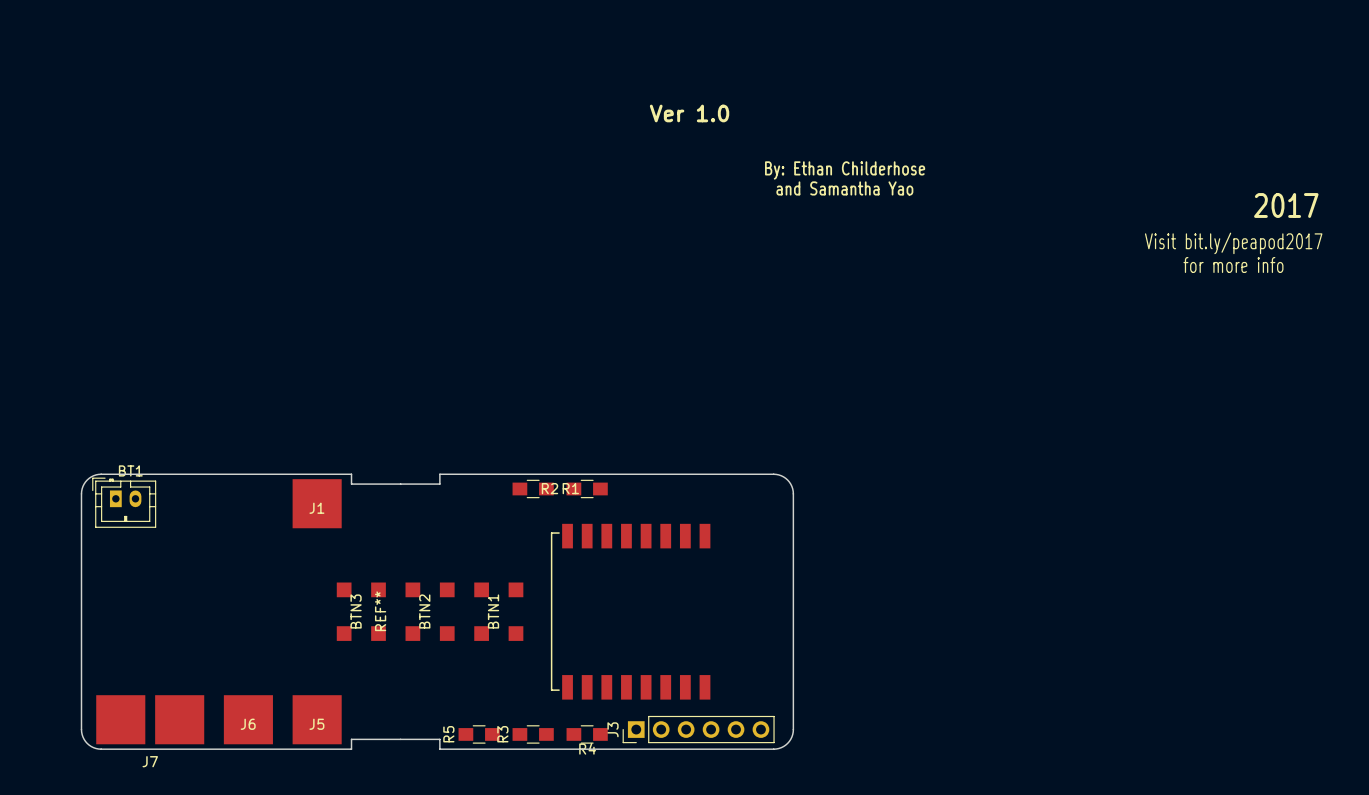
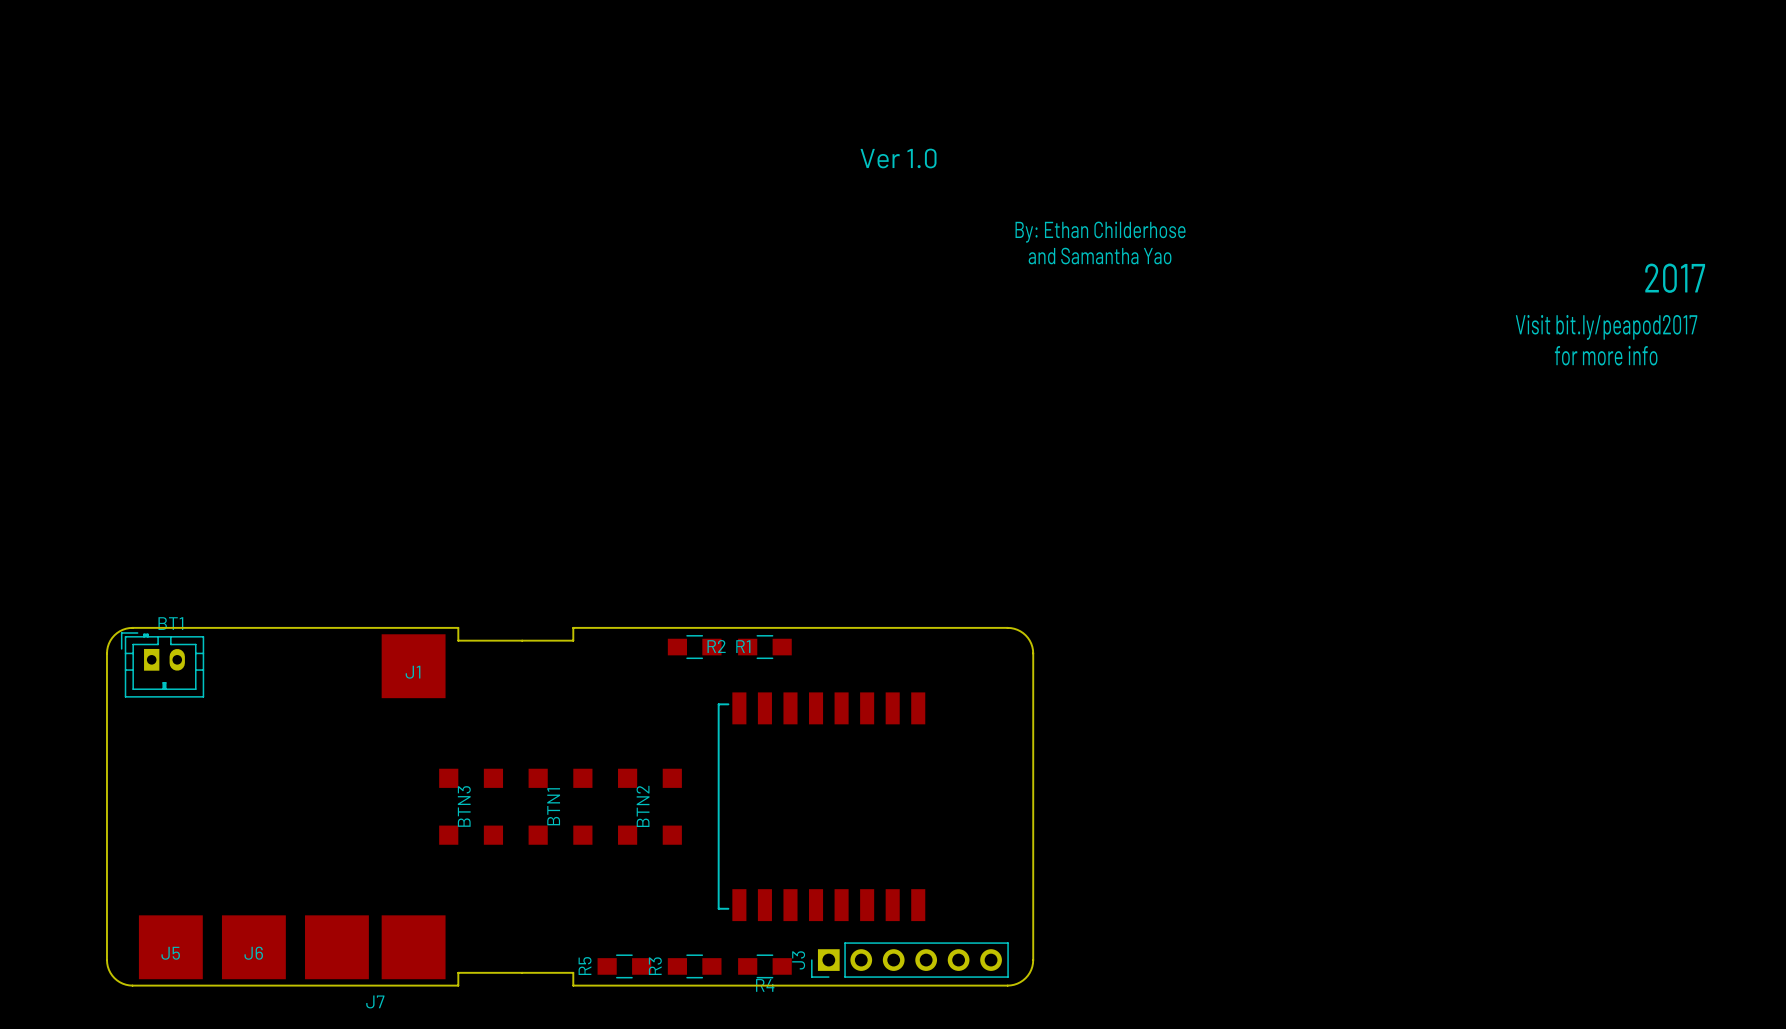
REF**: (380, 611) -> none
BTN2 name: BTN2 (424, 611) -> BTN1 (553, 806)
BTN1 name: BTN1 (493, 611) -> BTN2 (643, 806)
J7 position: (150, 719) -> (375, 947)
J6 position: (248, 719) -> (253, 947)
J5 position: (317, 719) -> (170, 947)

